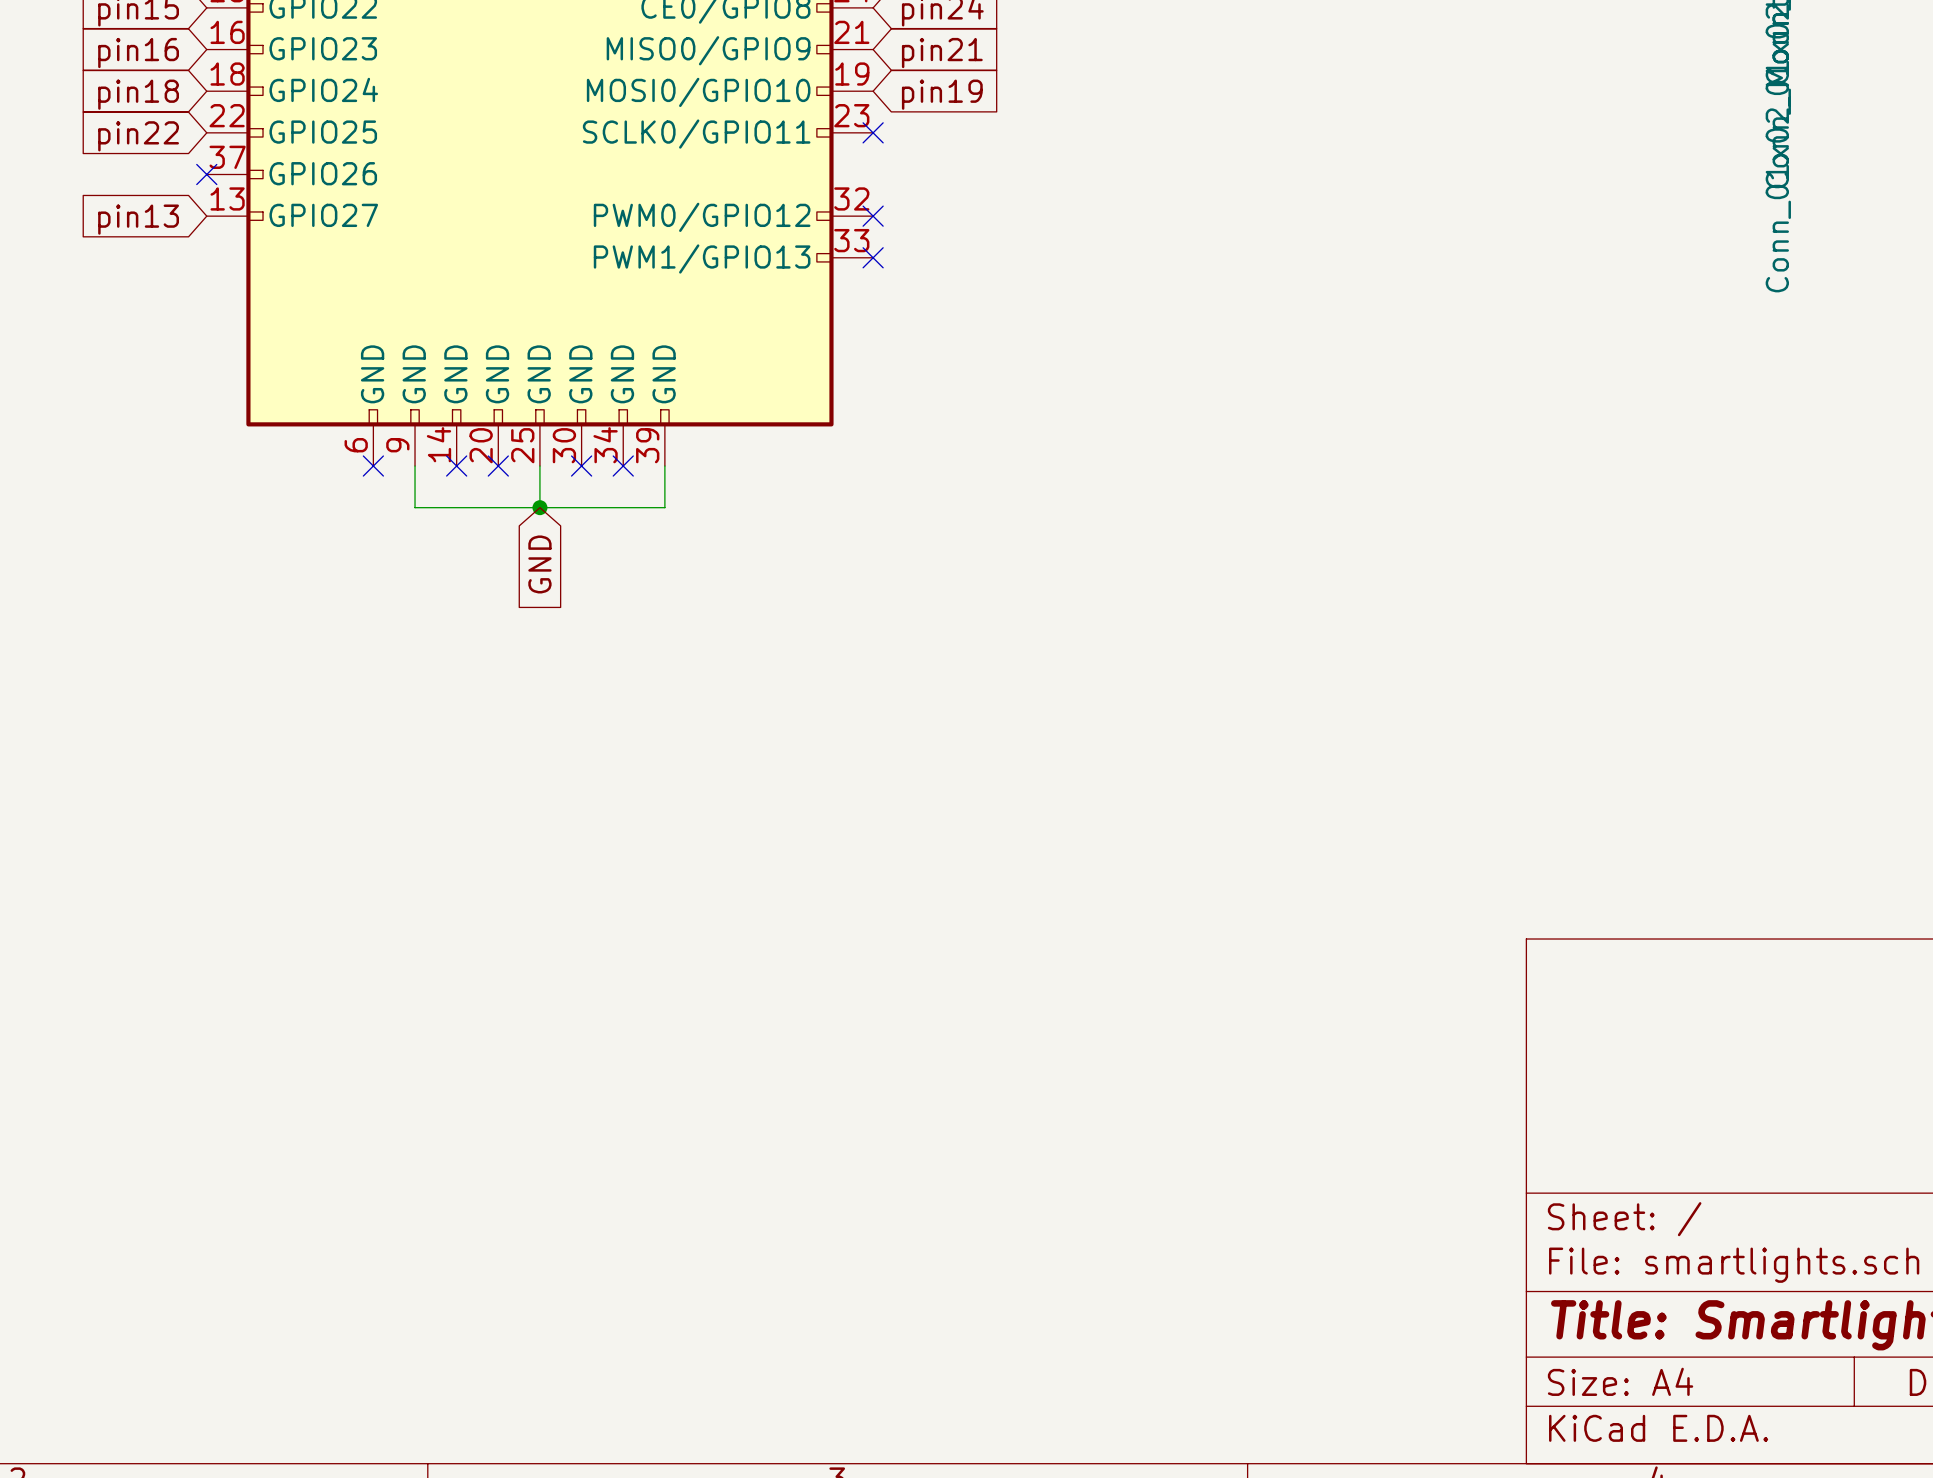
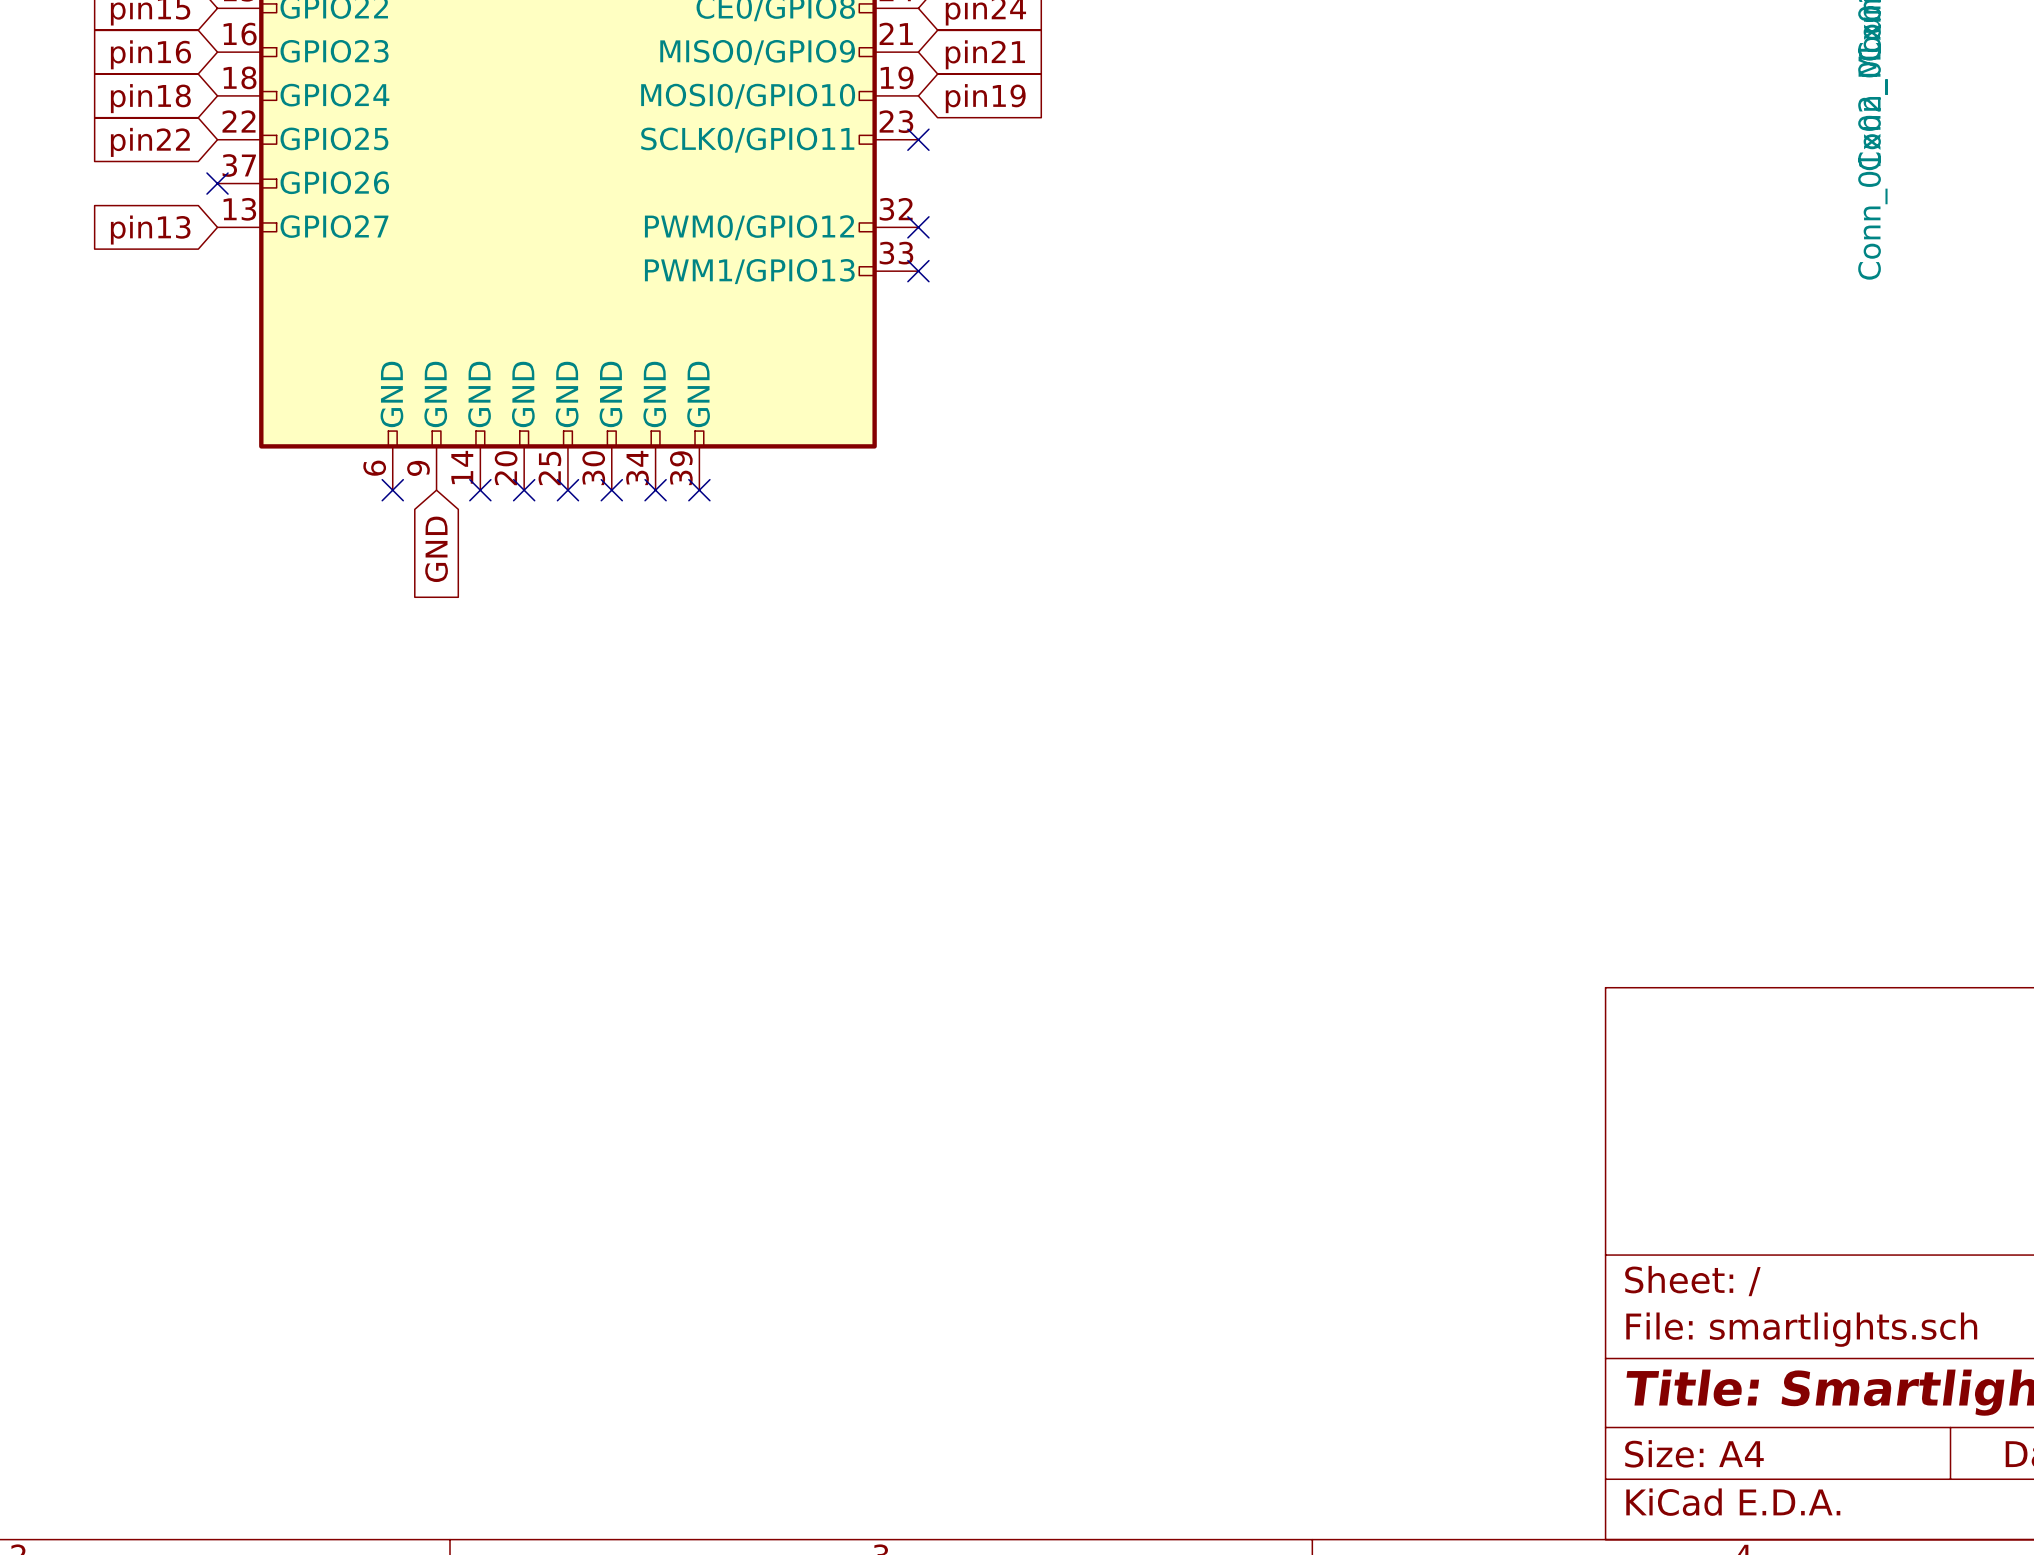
wire: (415, 466) (415, 507) (664, 507) (664, 466) -> none
wire: (539, 466) (539, 507) -> none
no-connect mark: none -> (567, 490)
no-connect mark: none -> (699, 490)
junction: (539, 507) -> none
global label position: GND (539, 564) -> GND (436, 549)

